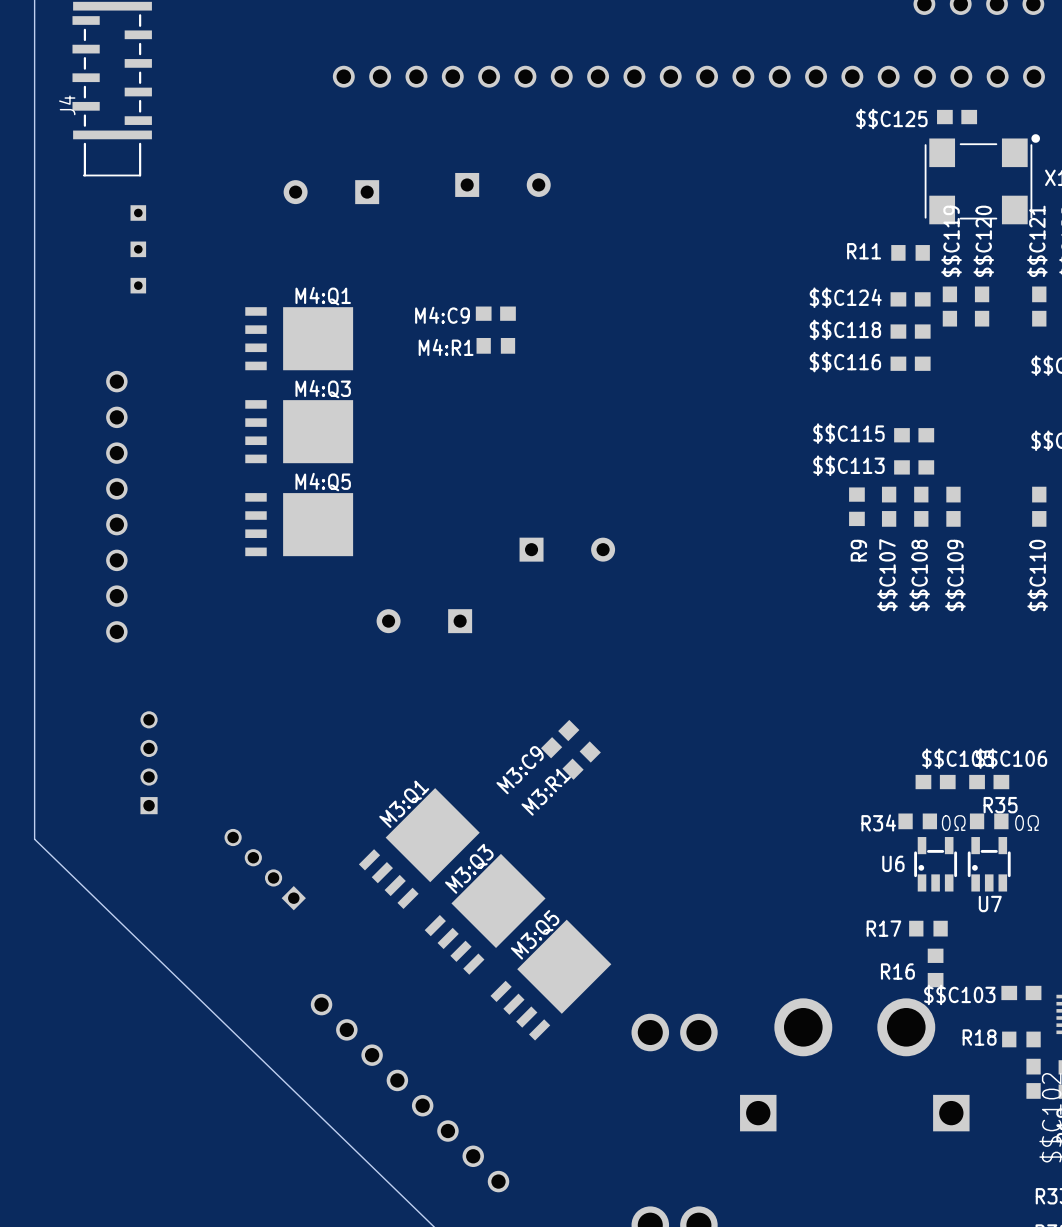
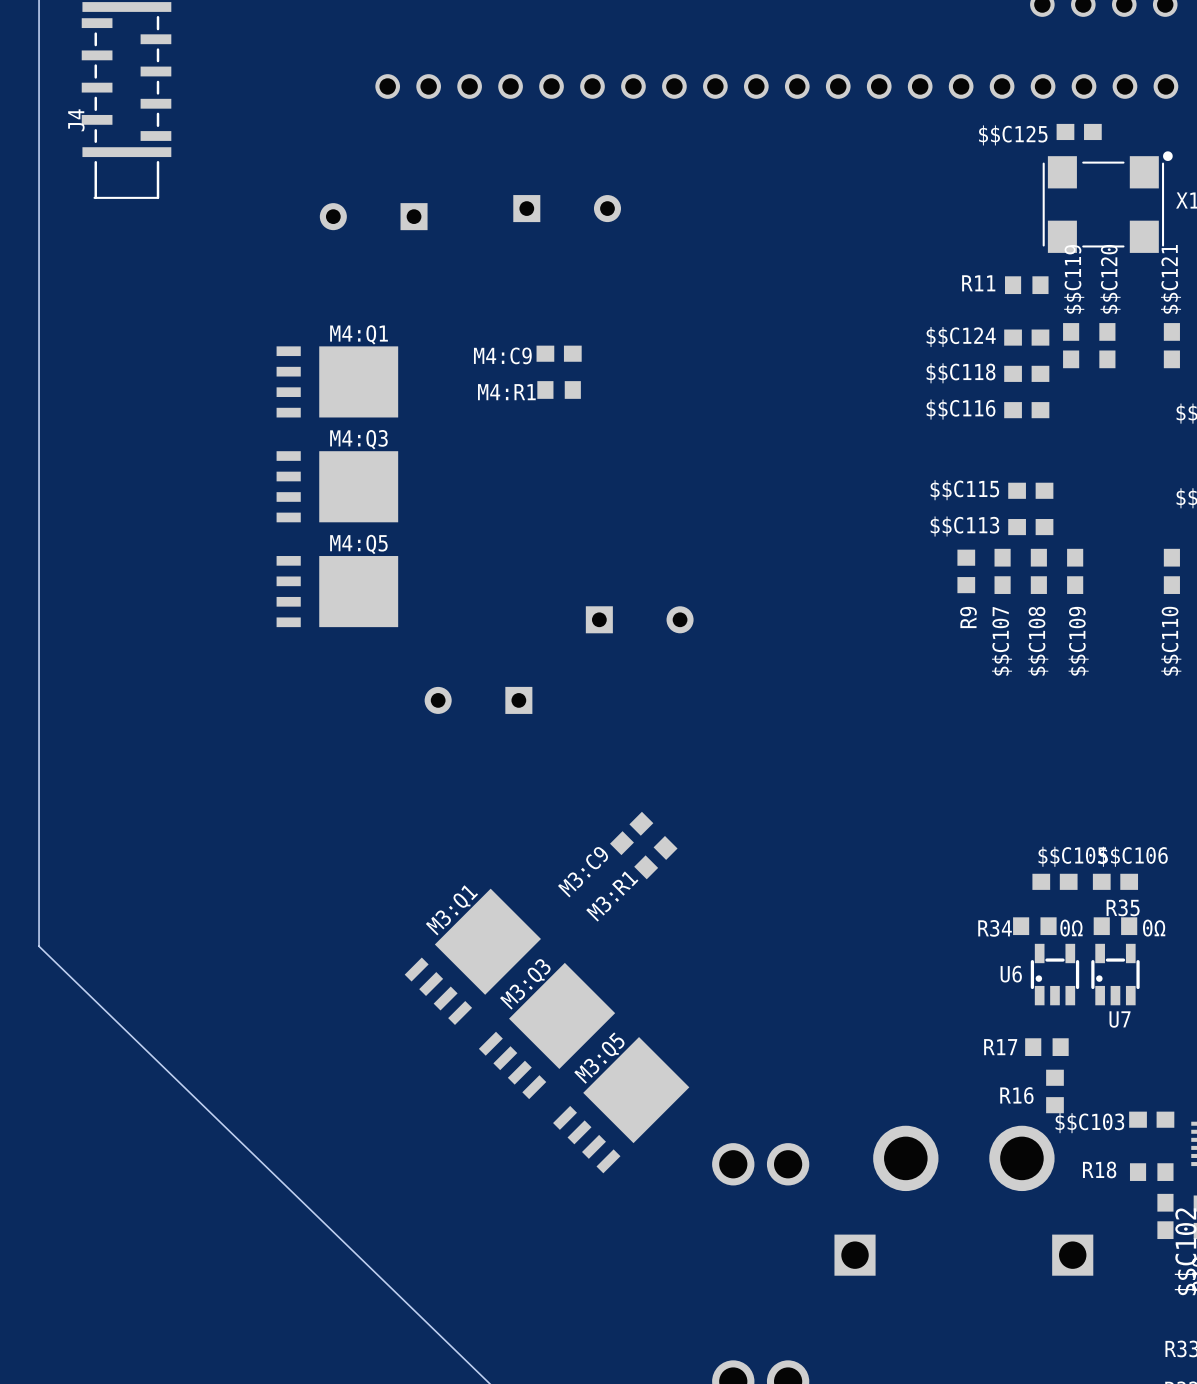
part: (138, 249) -> none
part: (116, 506) -> none
part: (149, 762) -> none
part: (265, 869) -> none
part: (410, 1093) -> none

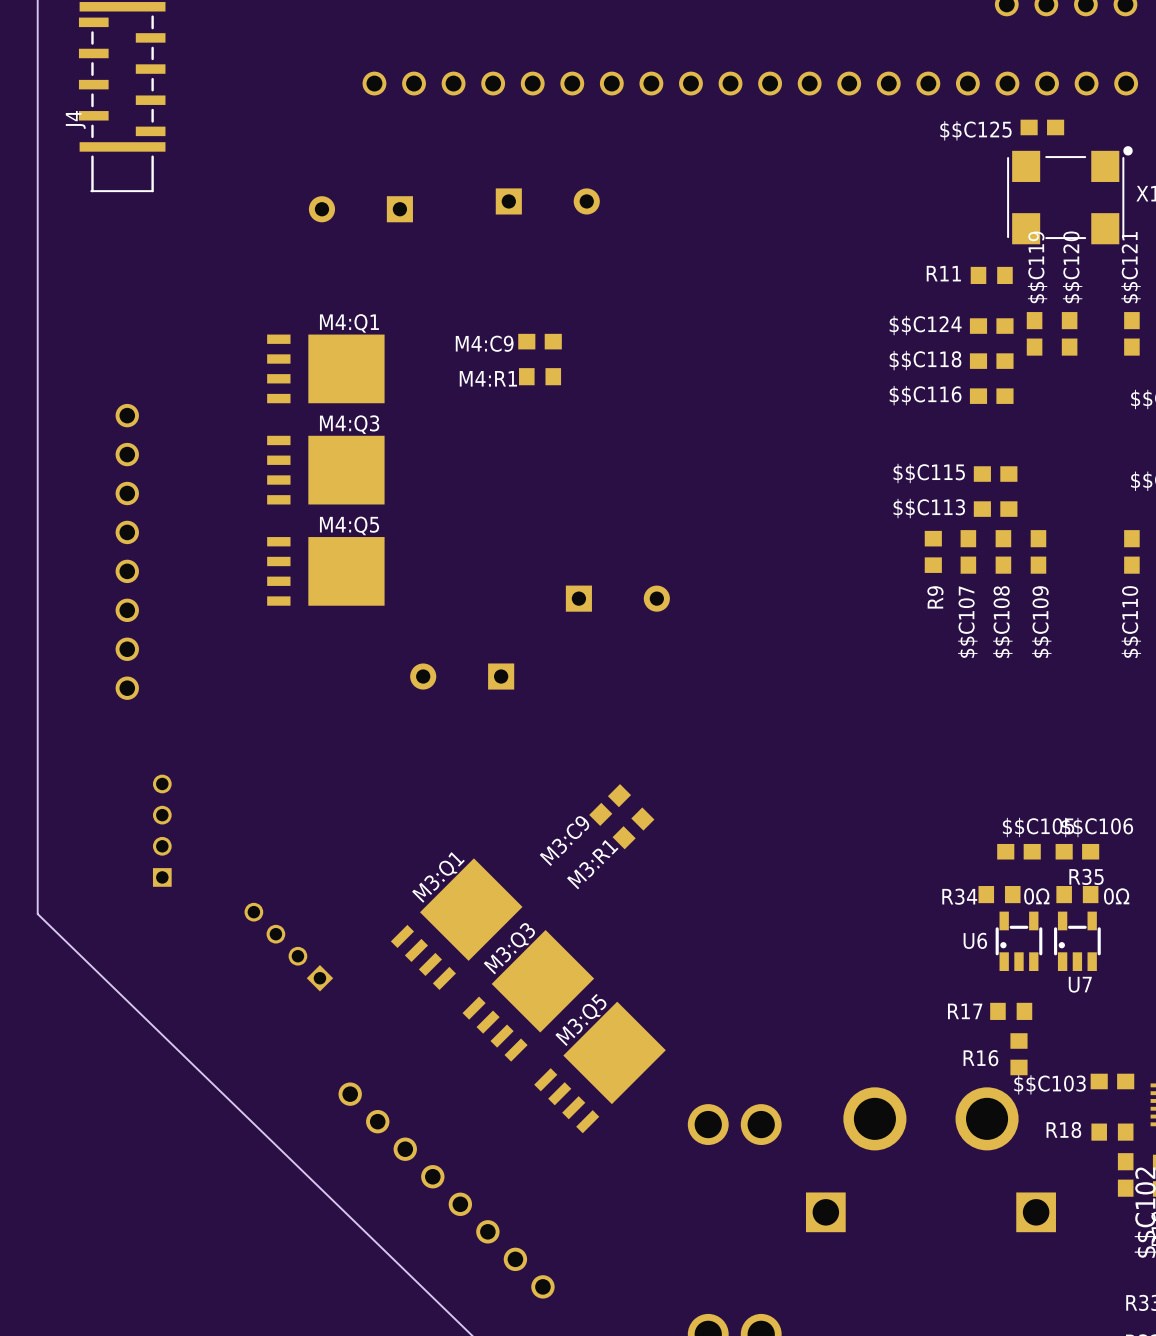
part: none -> (127, 551)
part: none -> (162, 830)
part: none -> (288, 947)
part: none -> (446, 1190)

